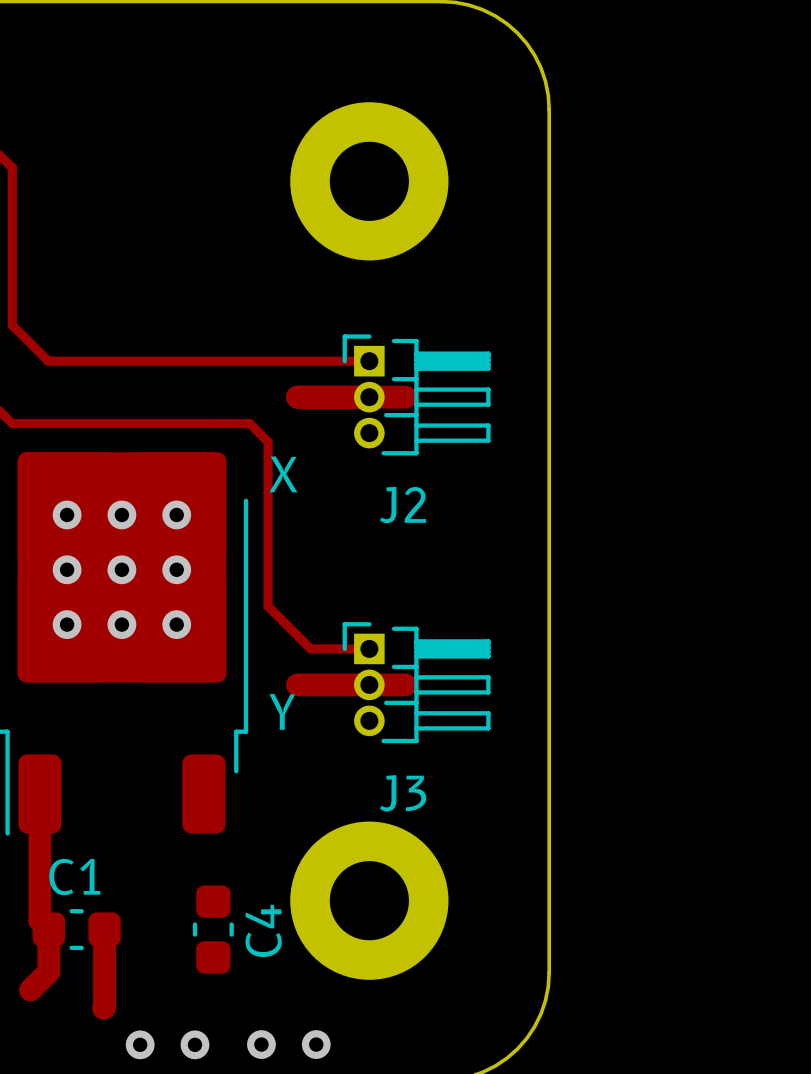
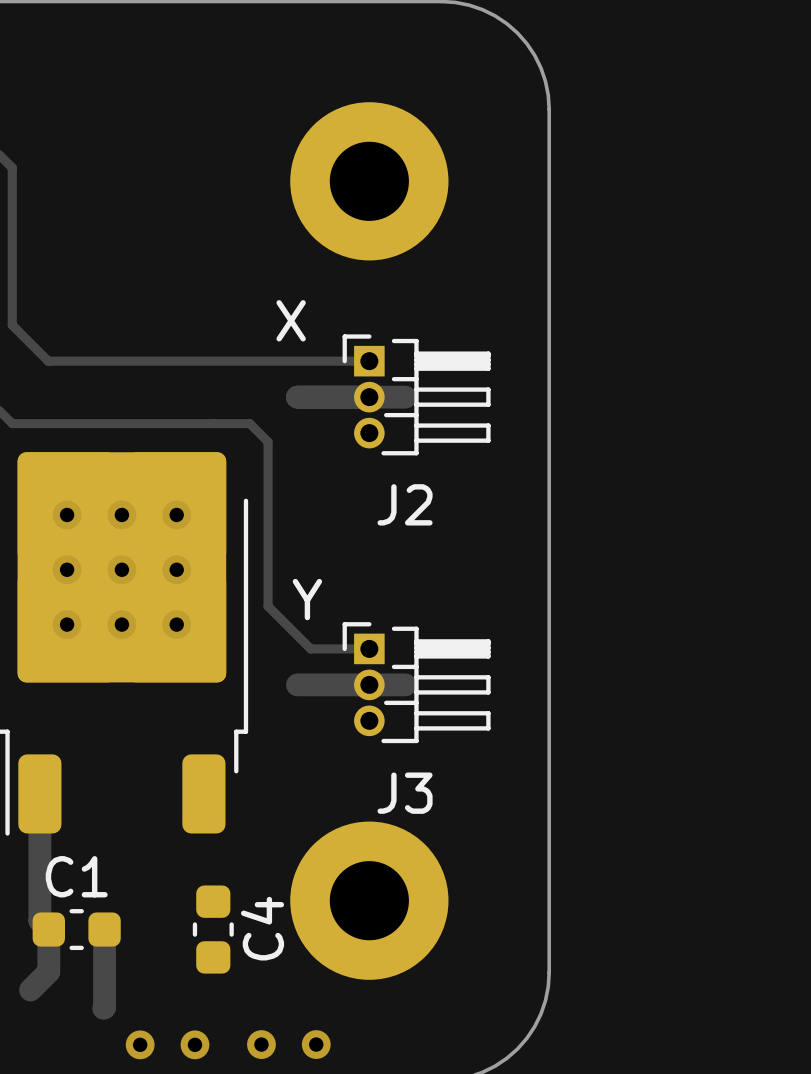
text position: X (283, 474) -> X (291, 320)
text position: Y (282, 711) -> Y (307, 599)

